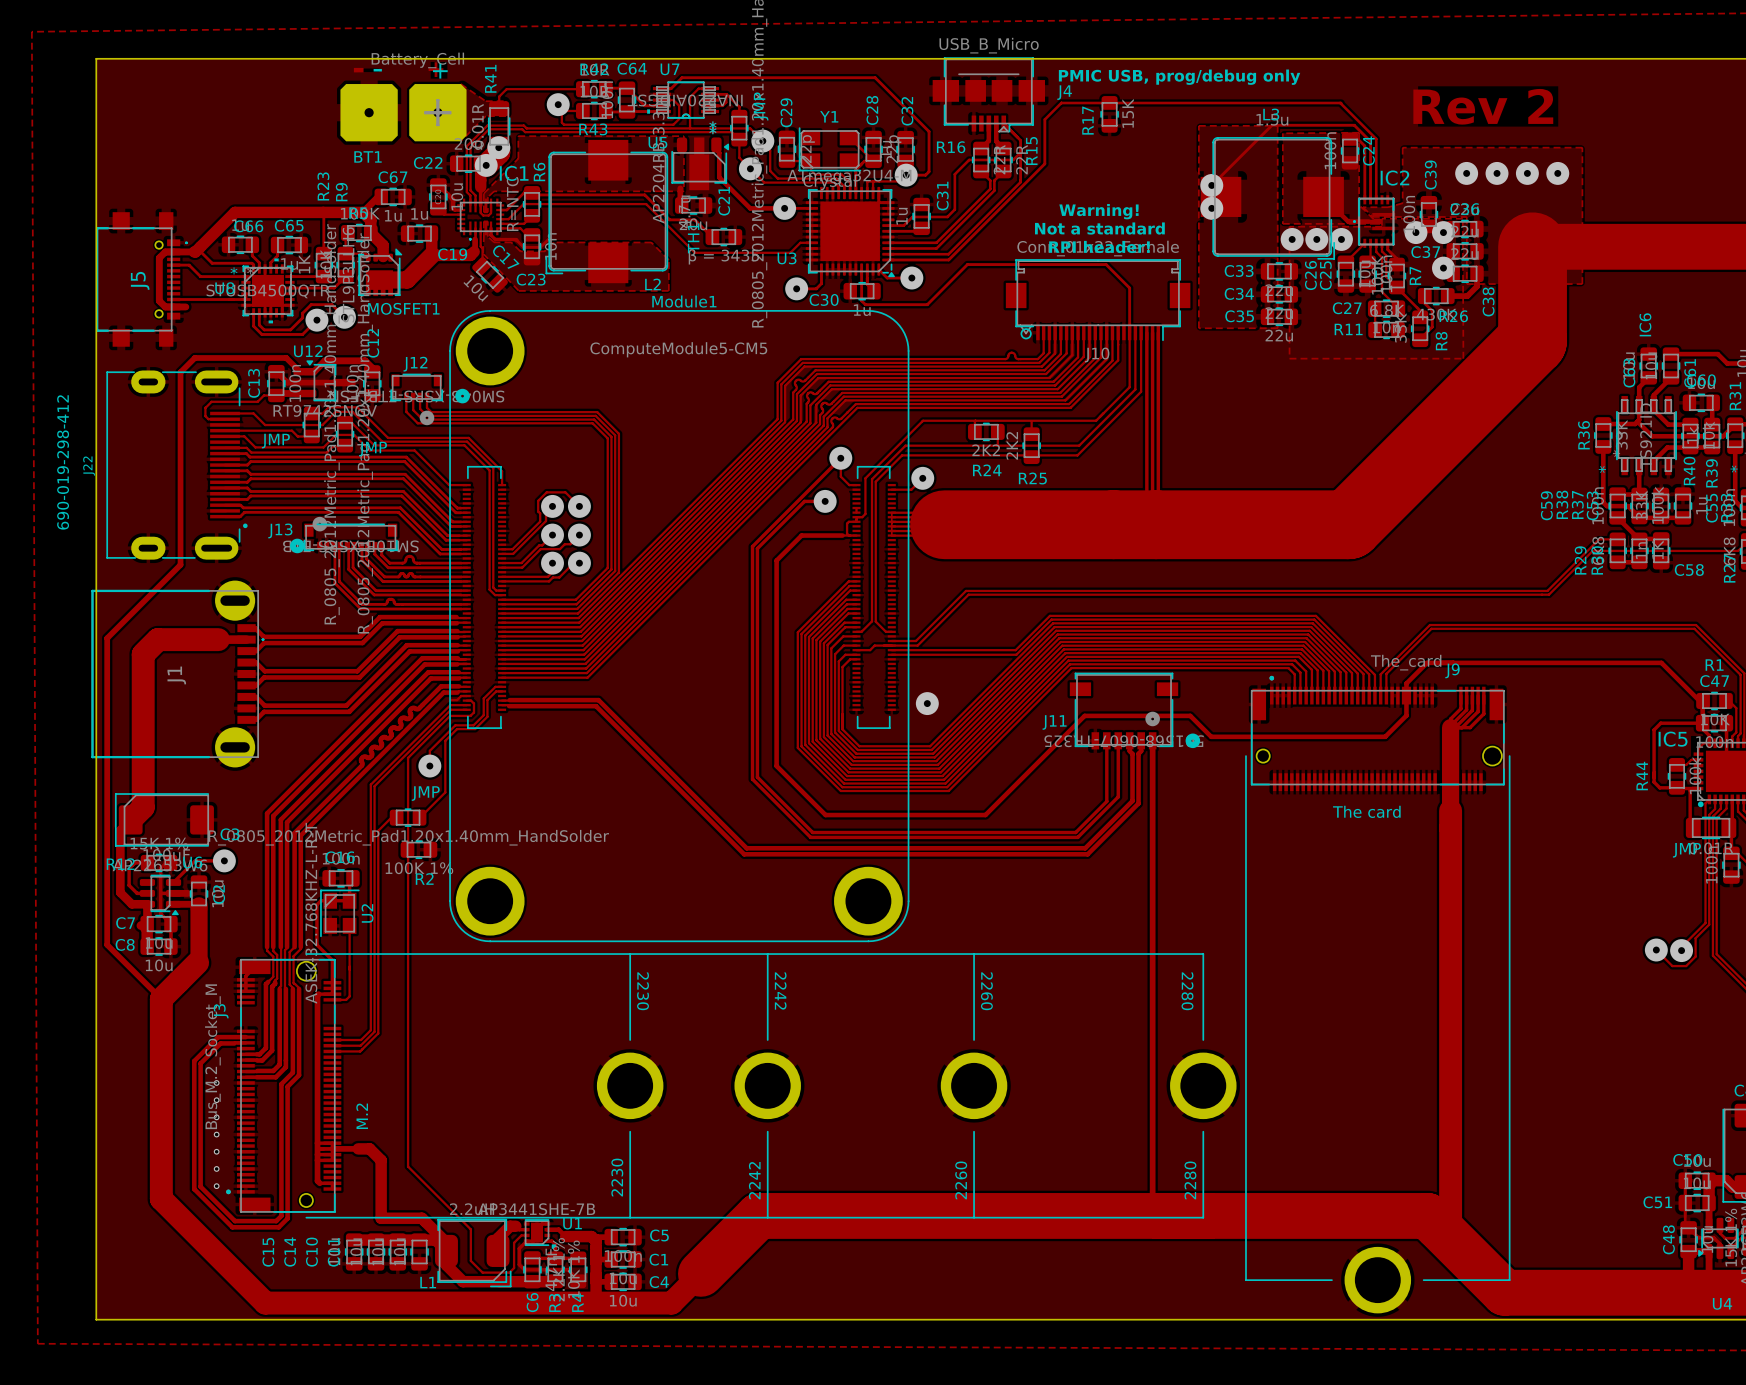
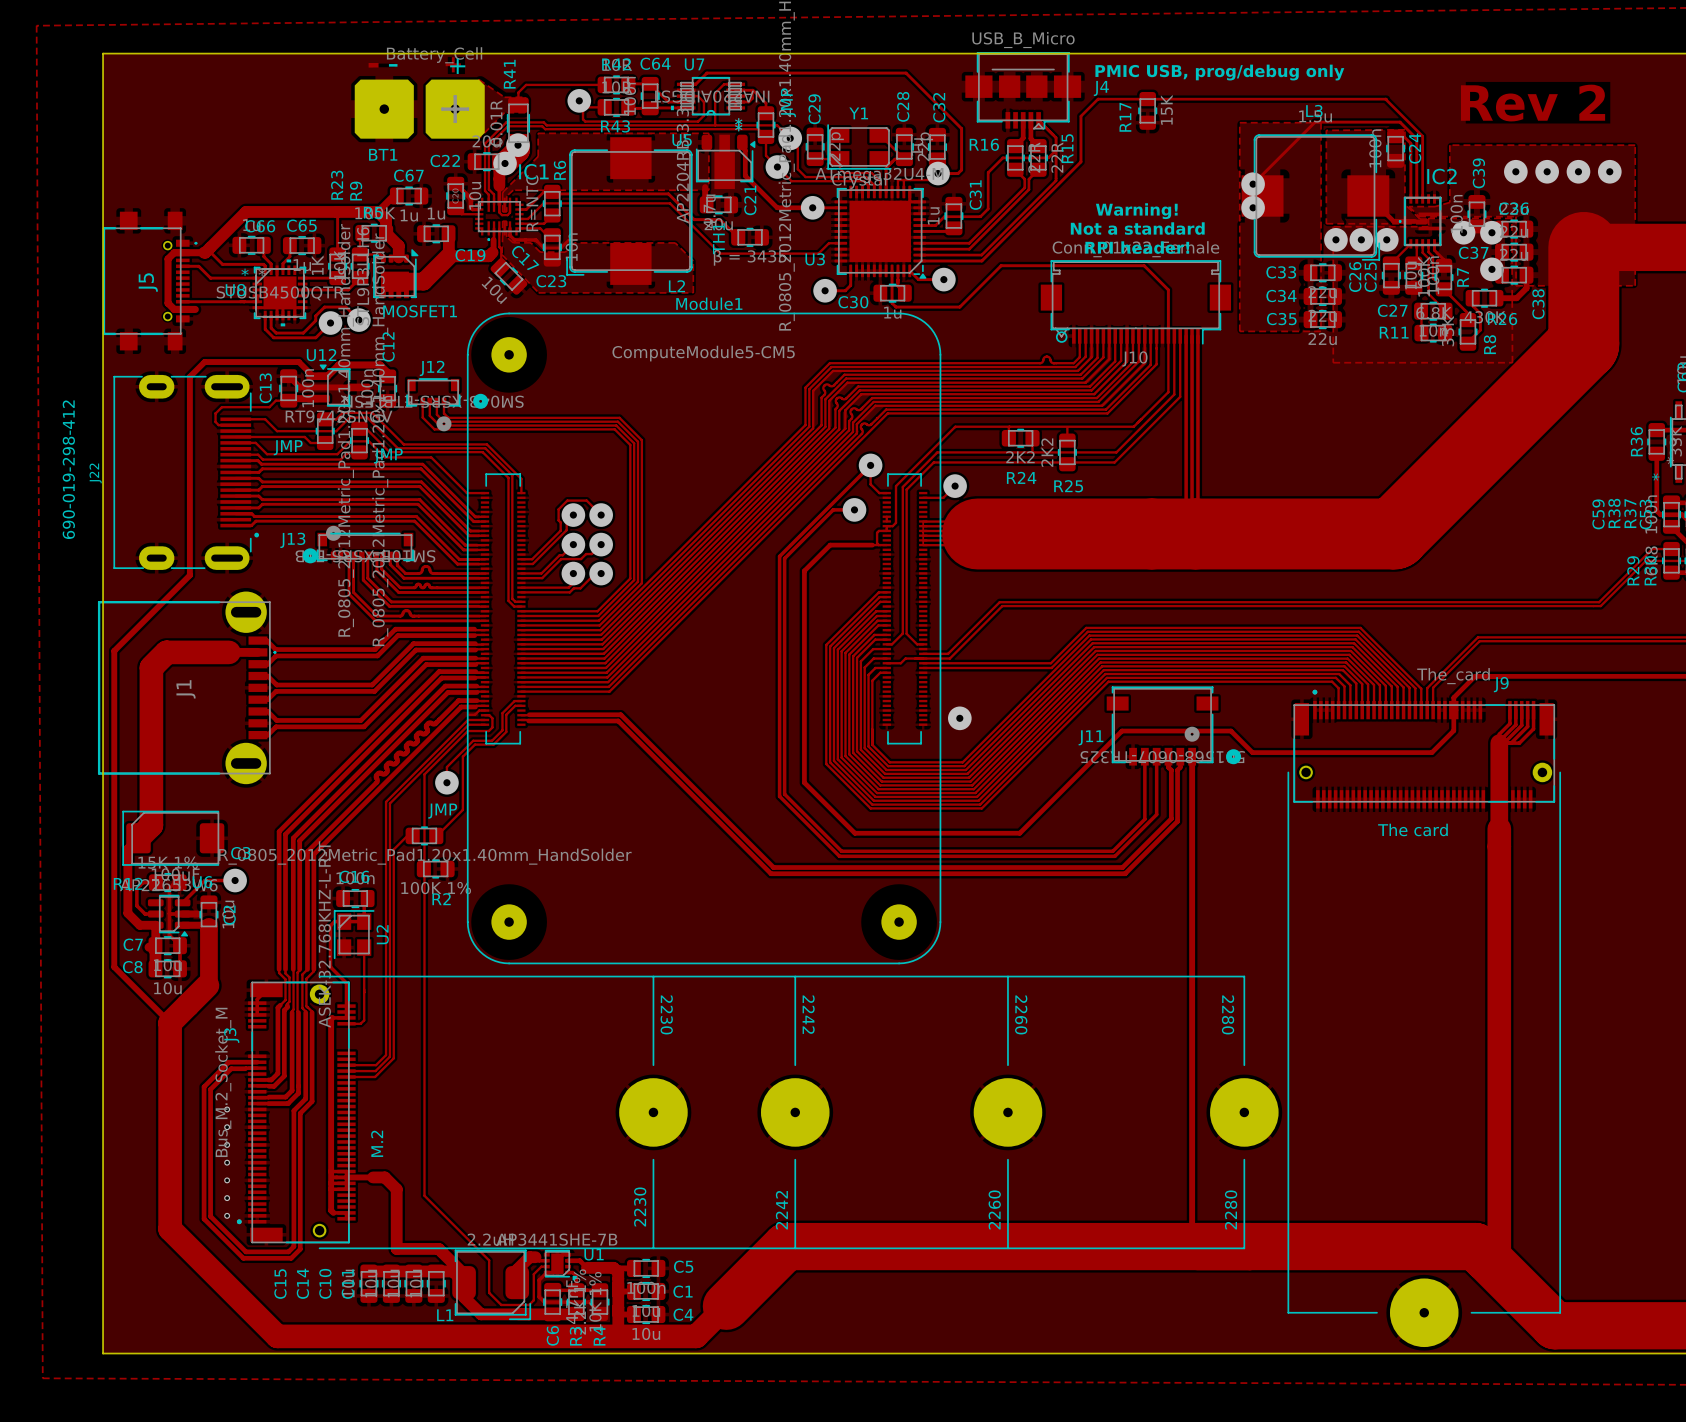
Module1 footprint: [449, 310, 910, 943] -> [467, 312, 942, 965]
J9 footprint: [1245, 675, 1511, 1314] -> [1287, 689, 1561, 1348]
J3 footprint: [226, 953, 1237, 1219] -> [236, 975, 1279, 1249]

